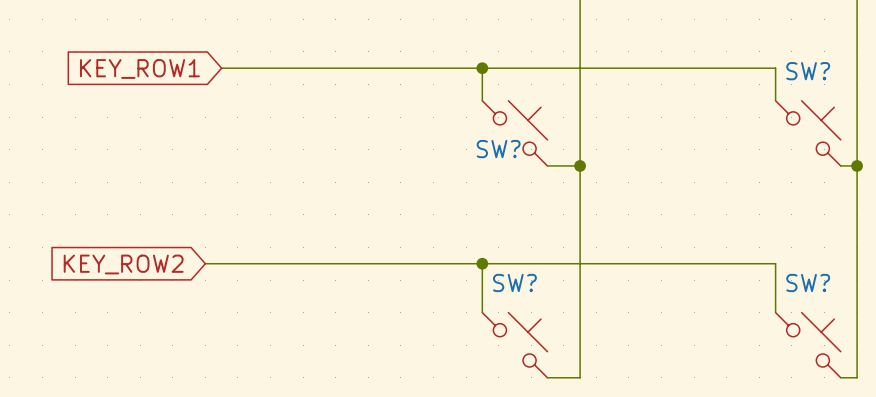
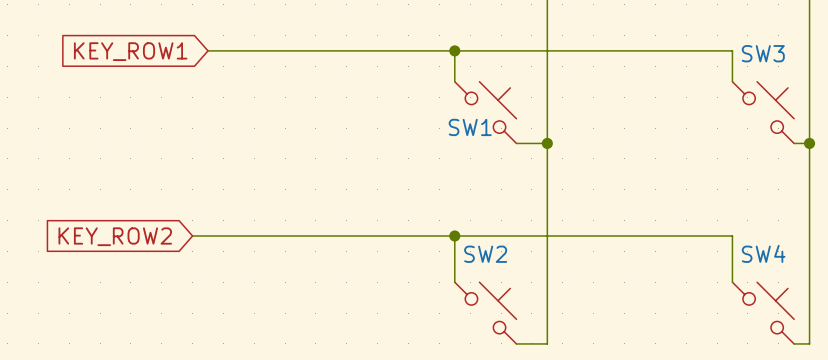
SW? name: SW? (808, 71) -> SW3 (763, 53)
SW? name: SW? (498, 149) -> SW1 (470, 127)
SW? name: SW? (514, 282) -> SW2 (485, 254)
SW? name: SW? (808, 282) -> SW4 (763, 253)

